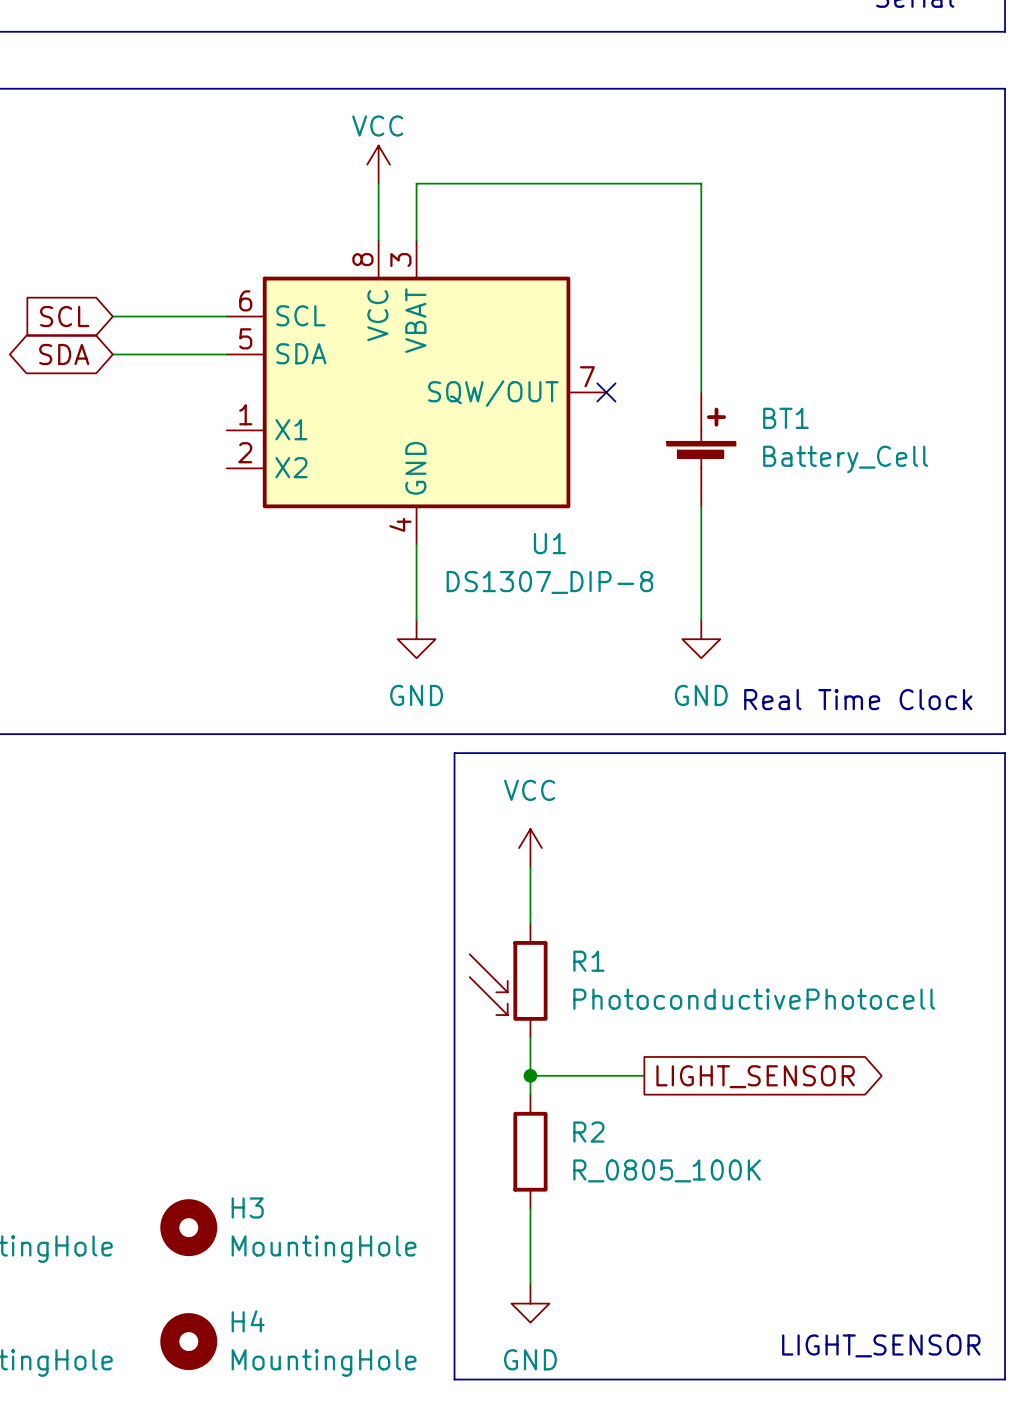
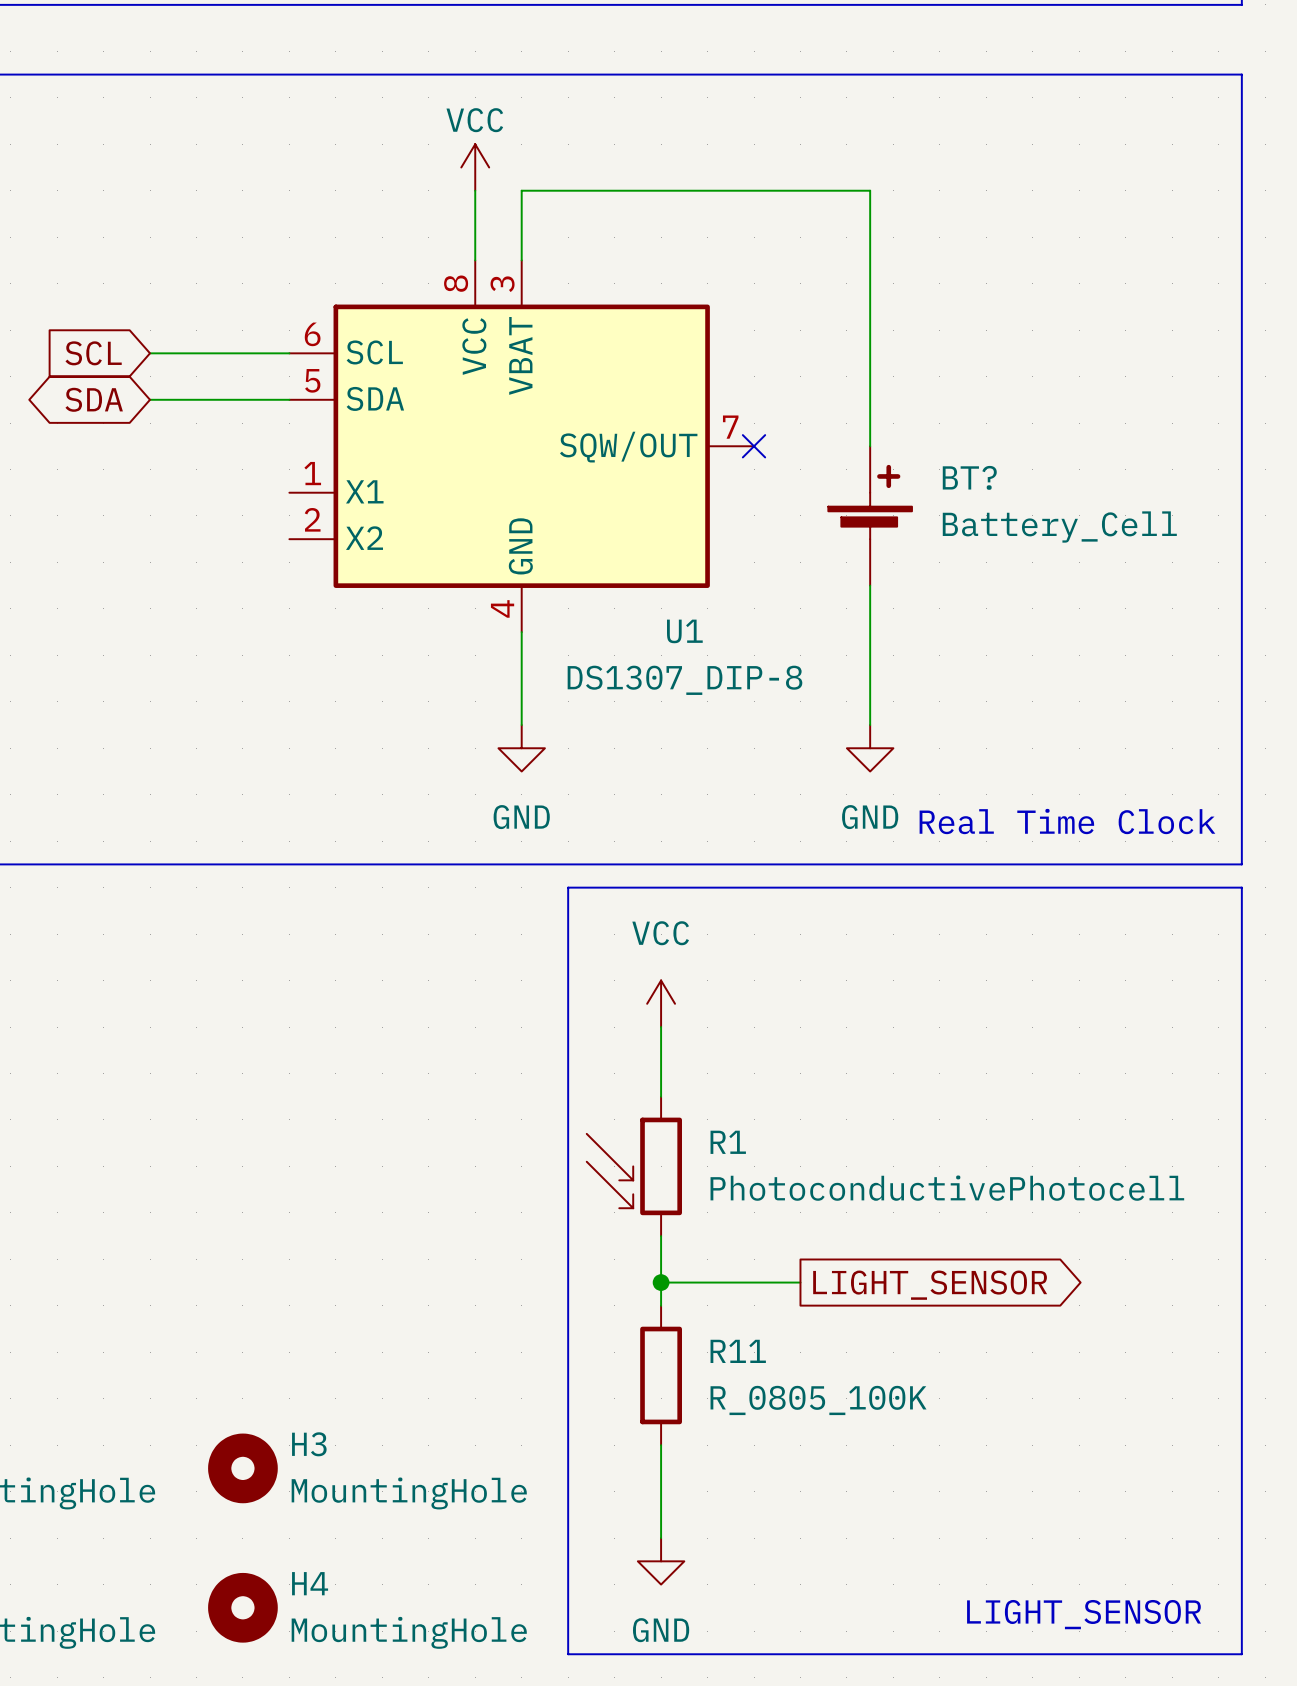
BT1 name: BT1 (785, 418) -> BT? (969, 477)
R2 name: R2 (588, 1132) -> R11 (738, 1351)

